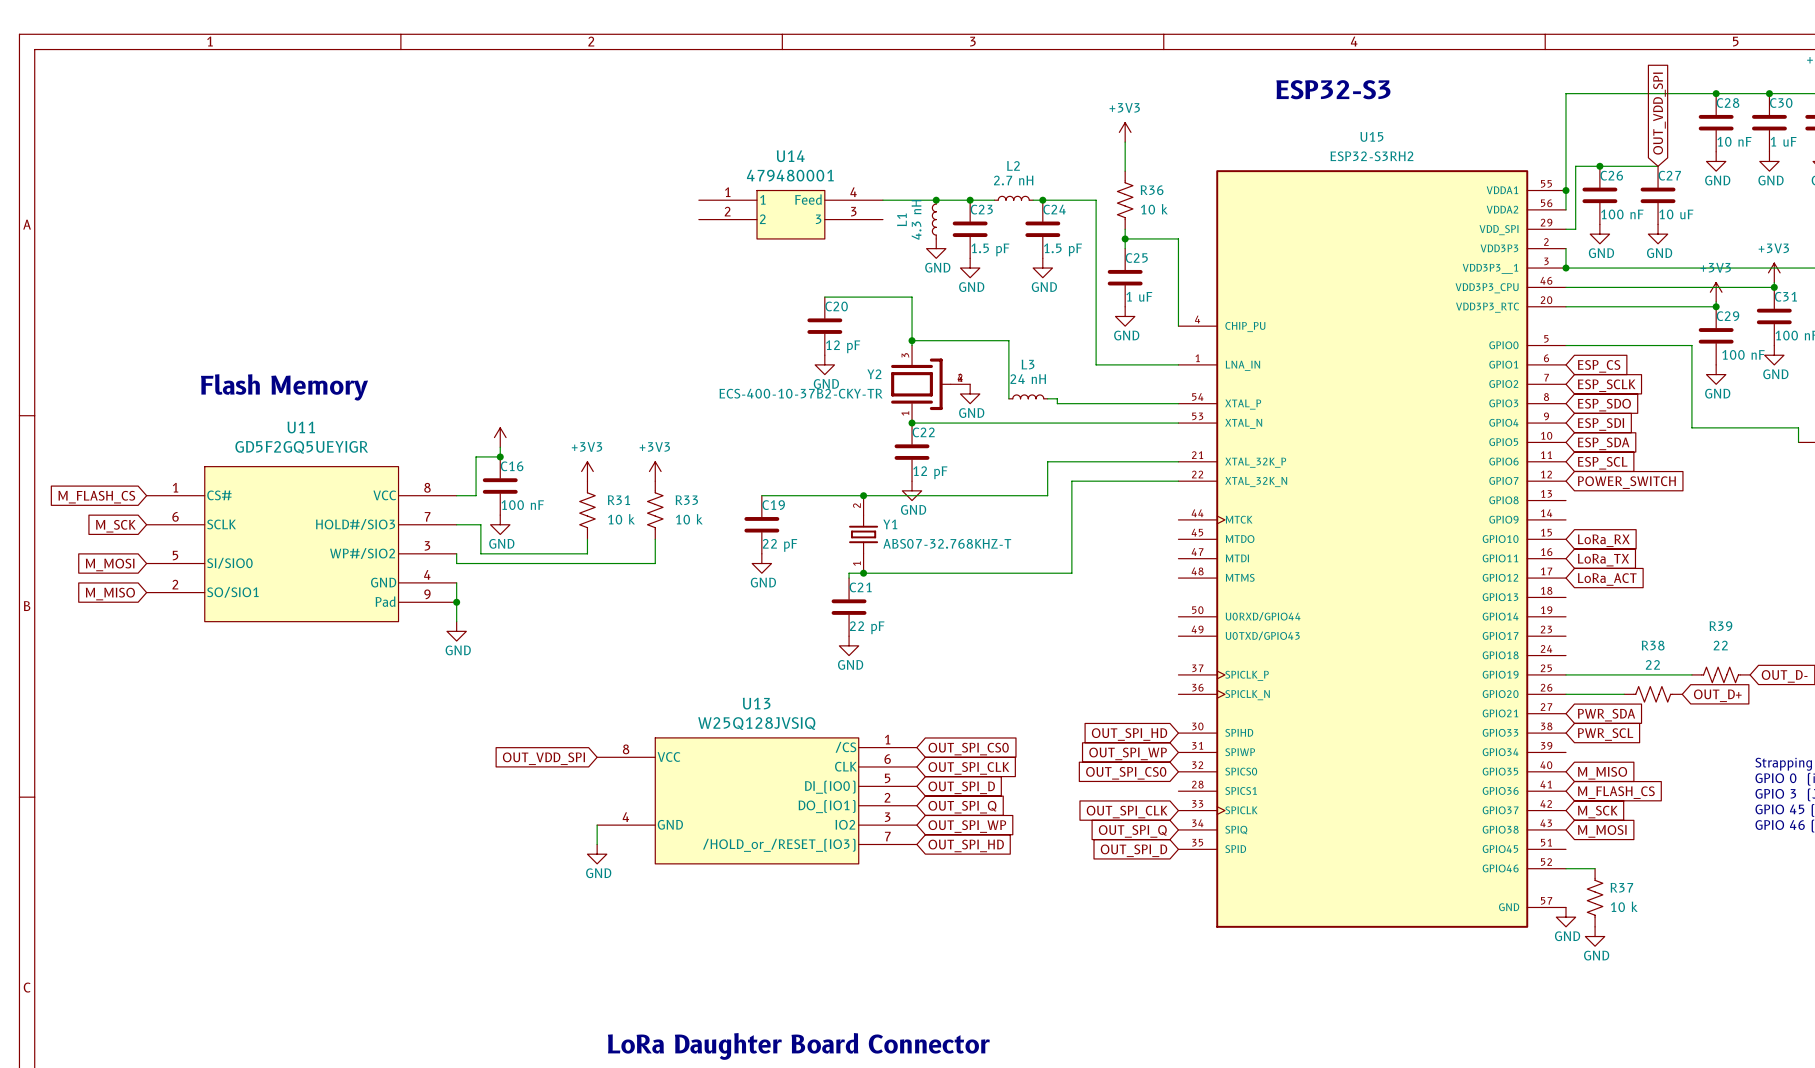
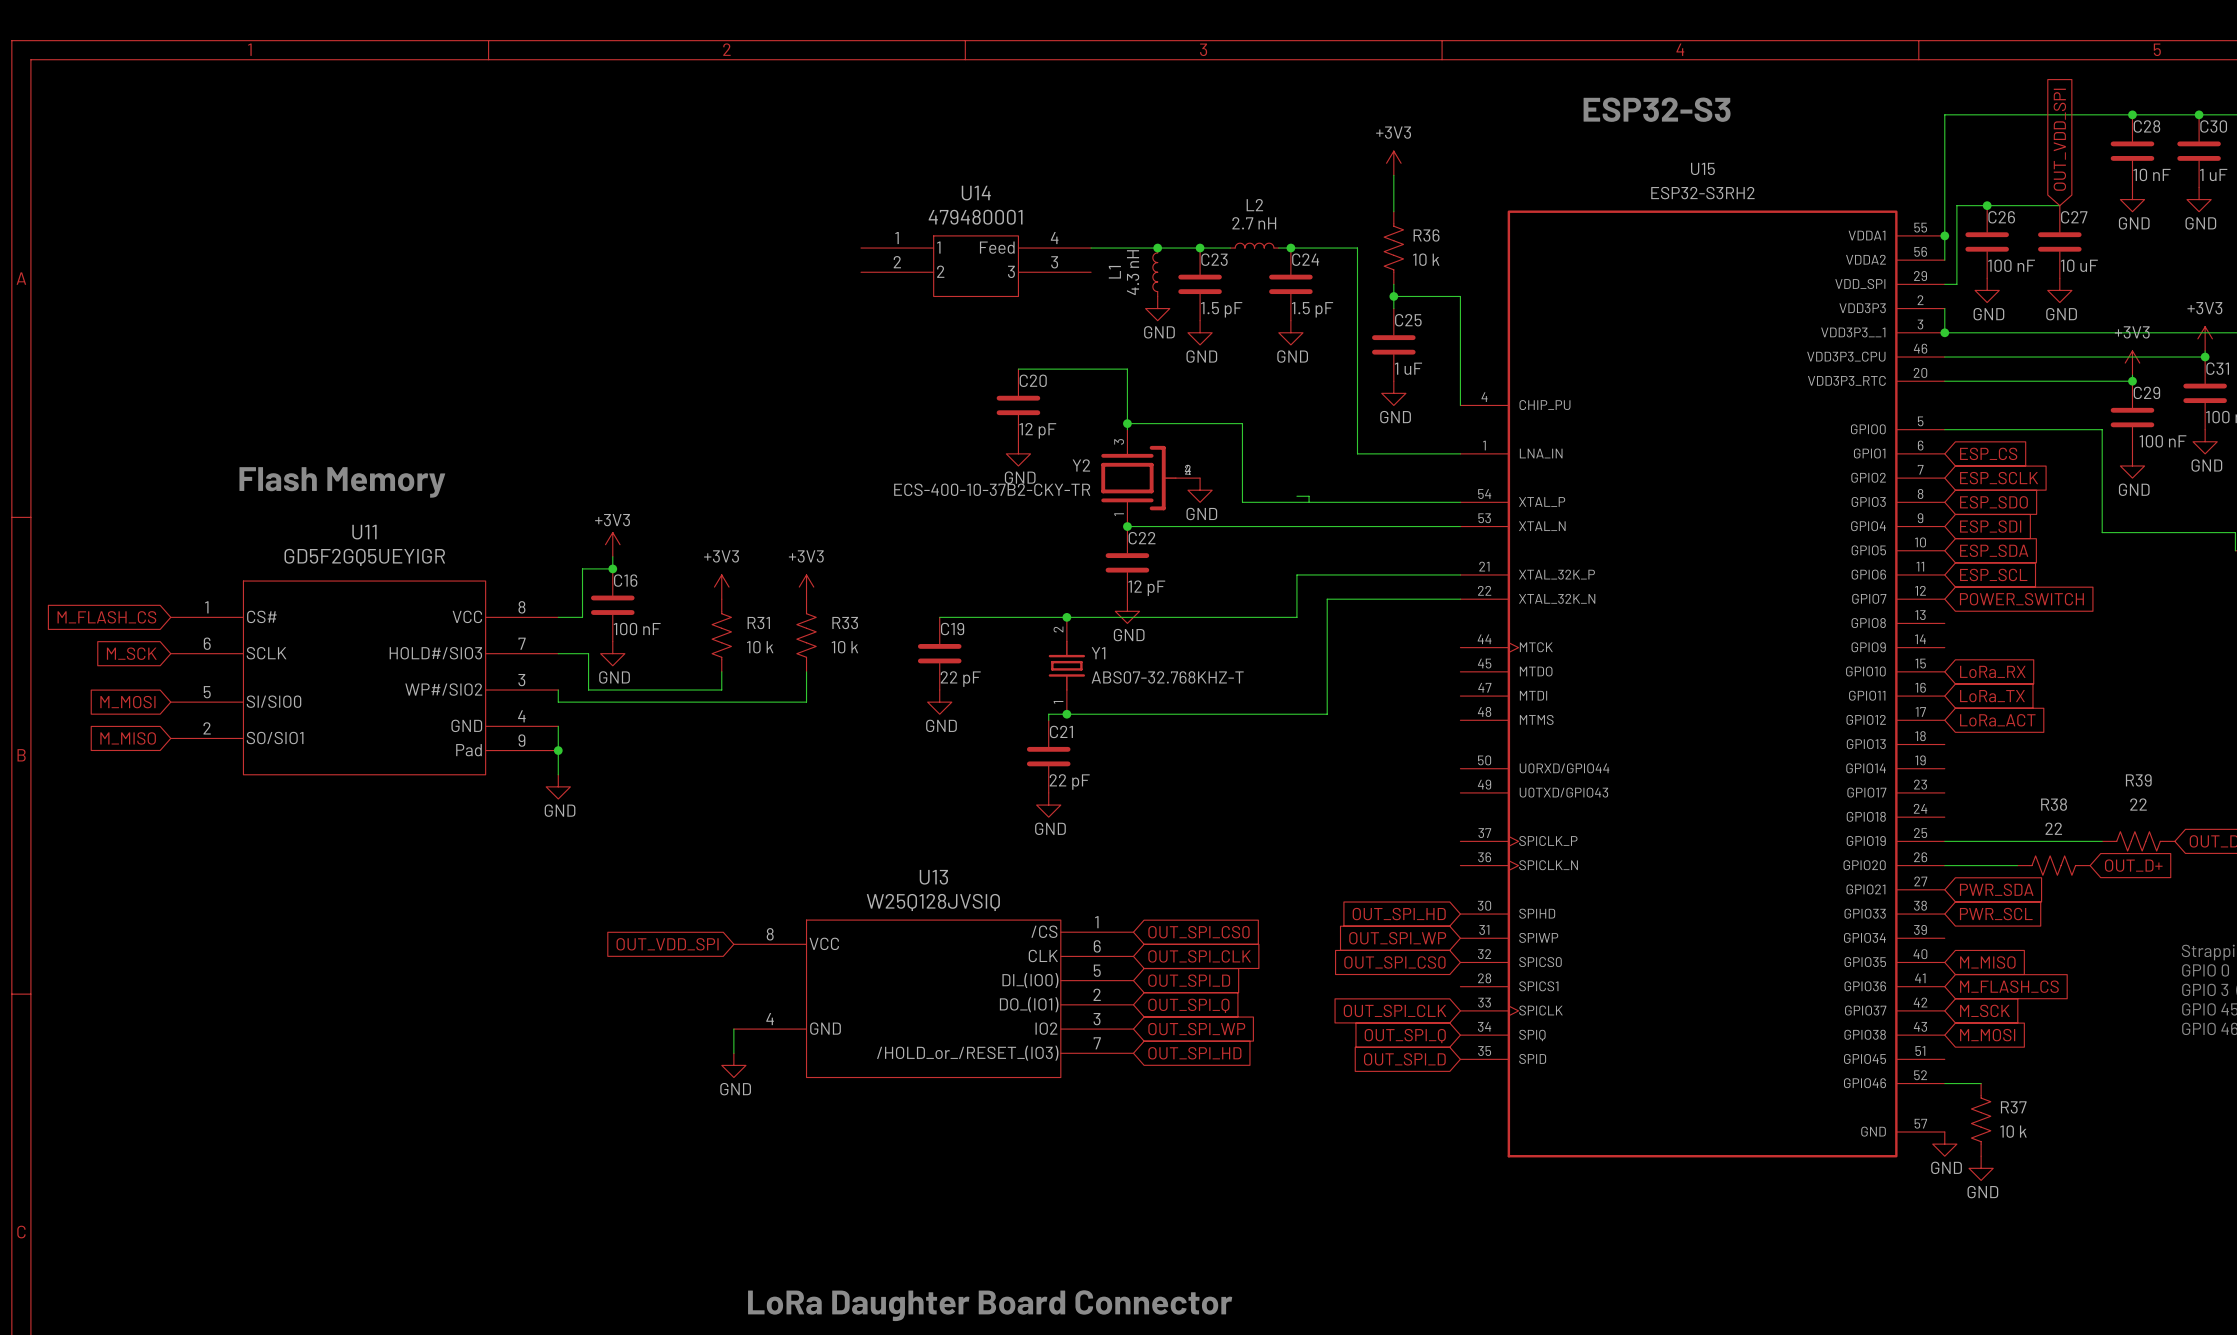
wire: (1004, 340) (1008, 340) (1008, 398) -> (1242, 423) (1242, 502) (1309, 502)
L3: 24 nH (1028, 396) -> none
power symbol text: none -> +3V3 (612, 520)

